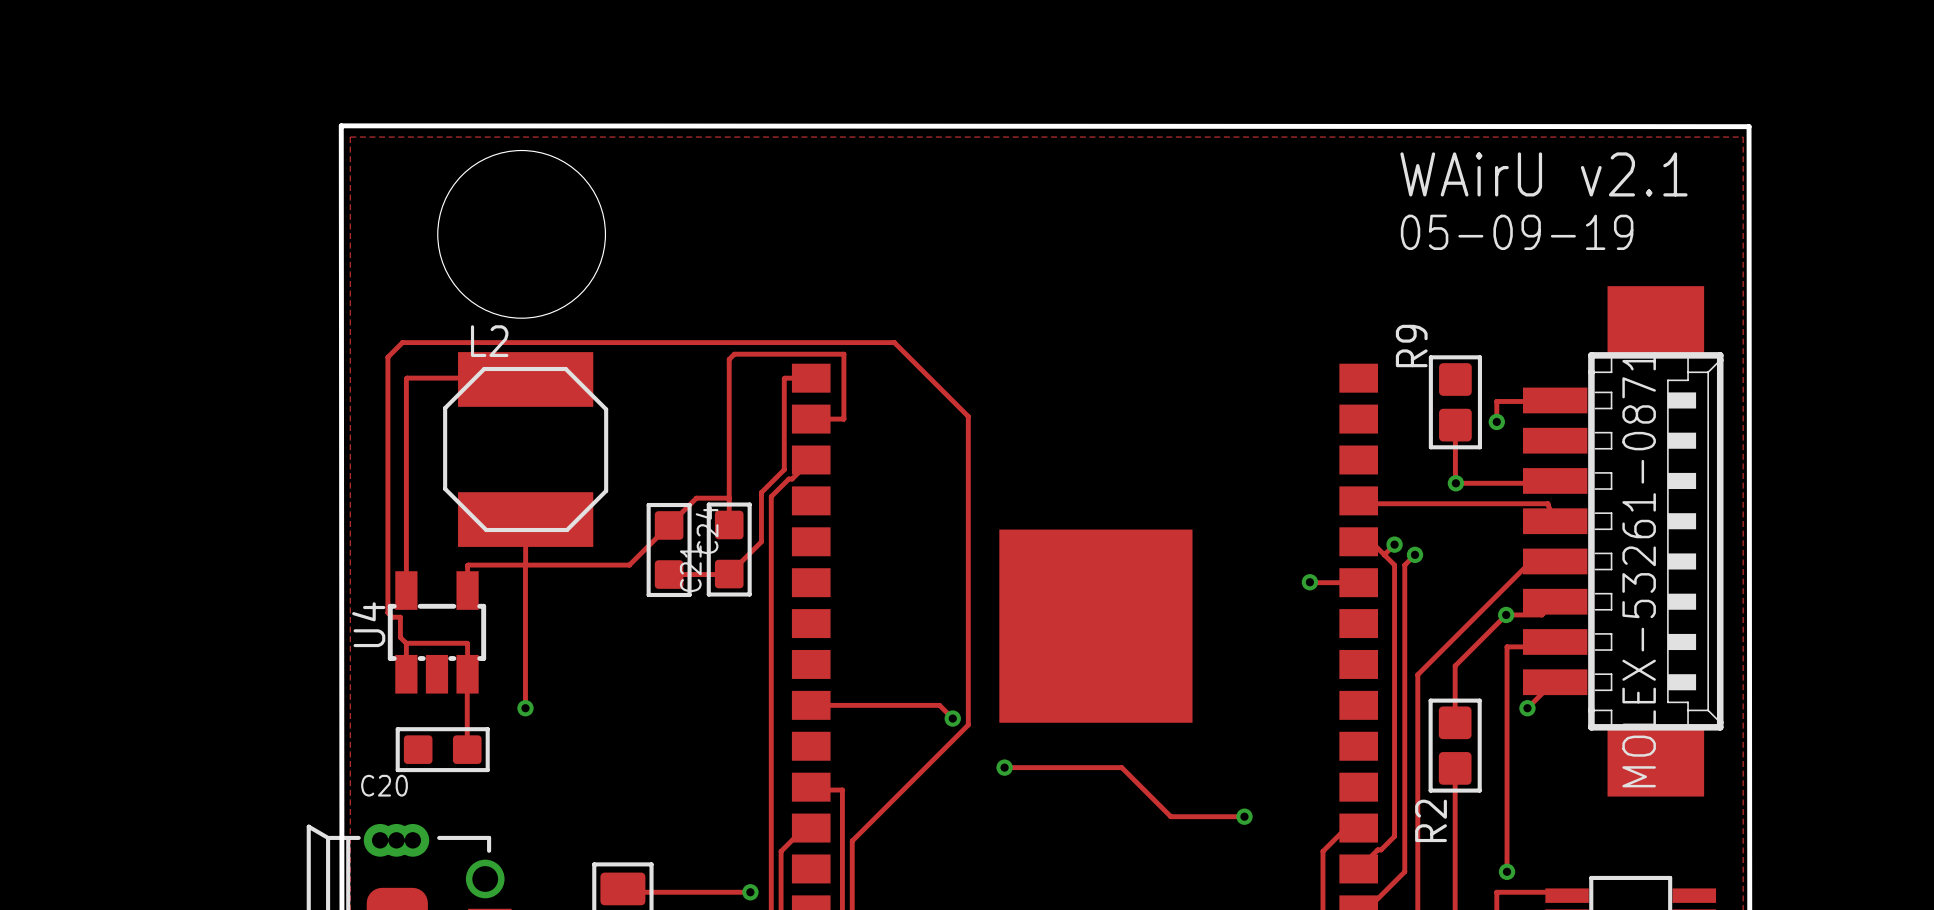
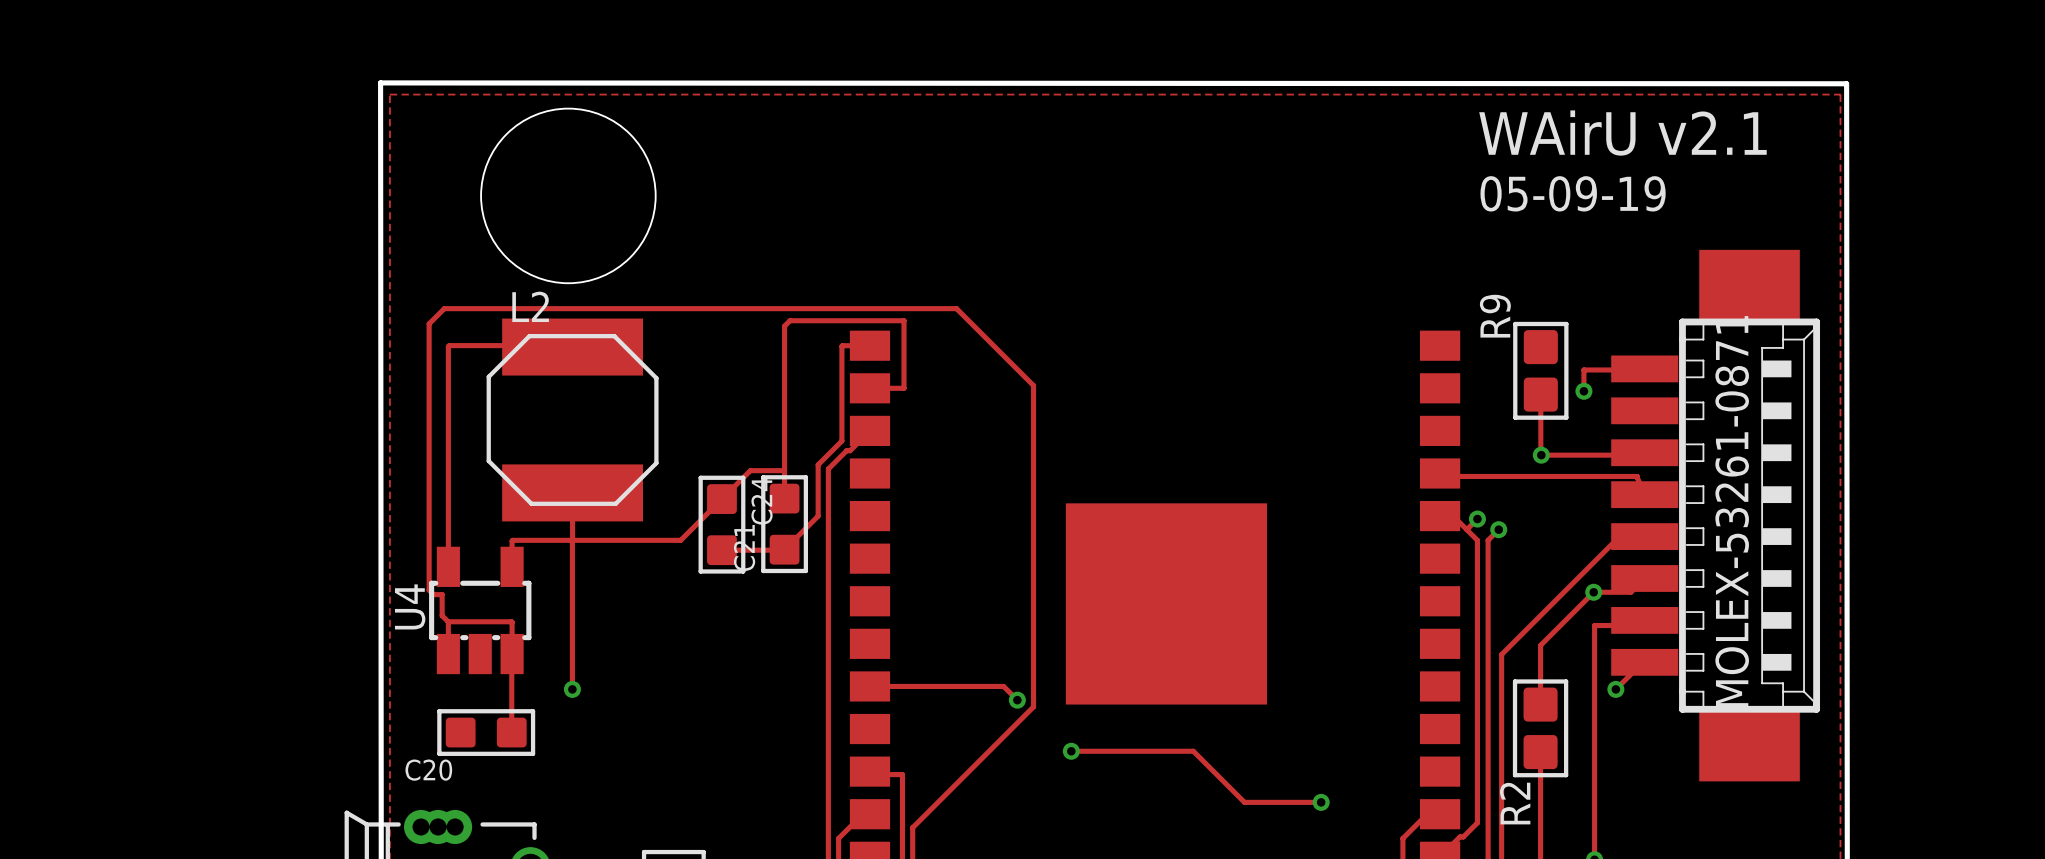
via: (1309, 582) -> none
track: (1310, 582) (1358, 582) -> none

